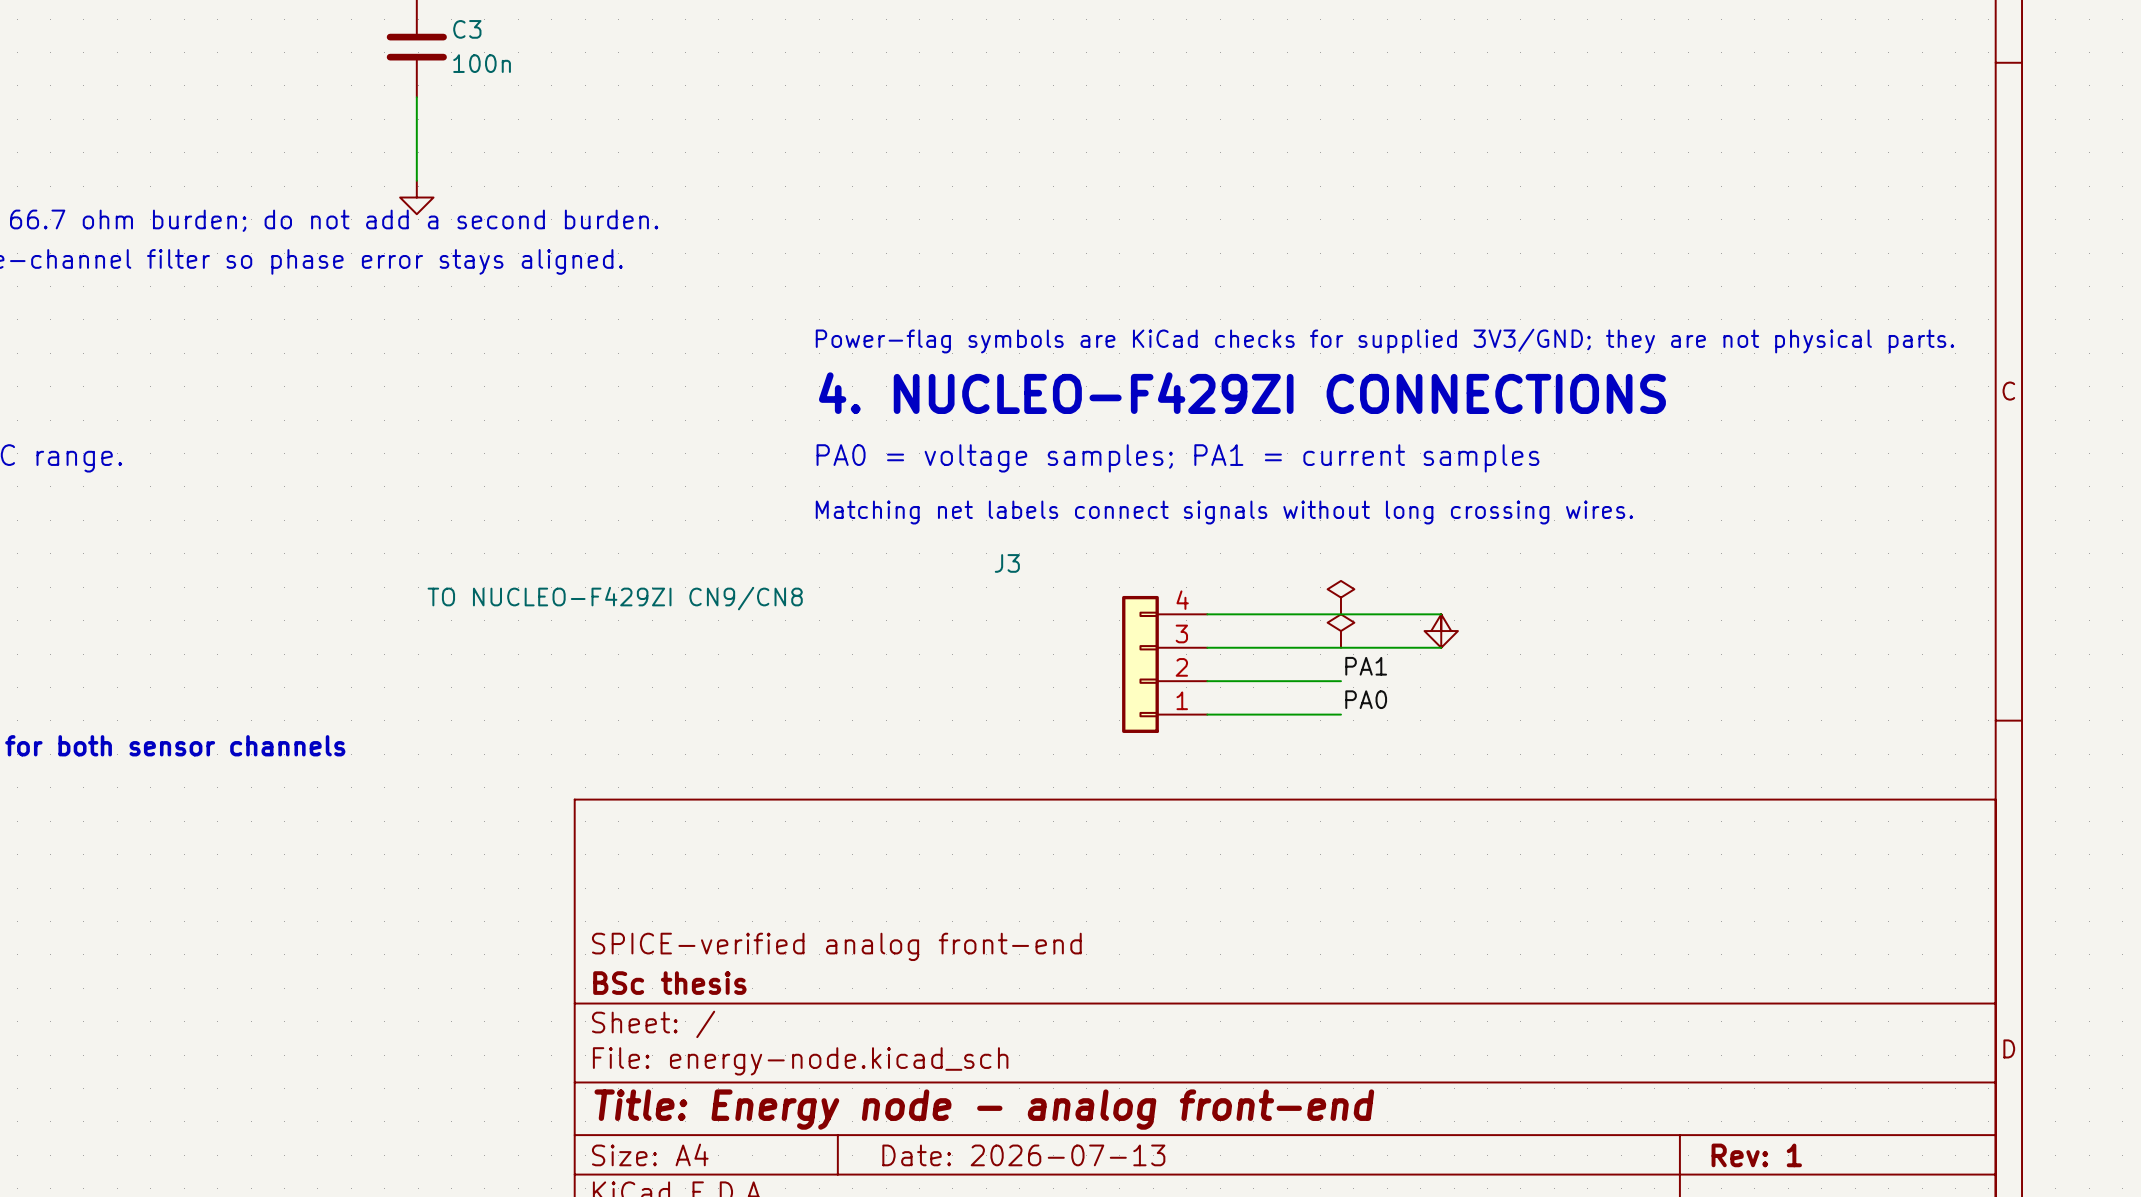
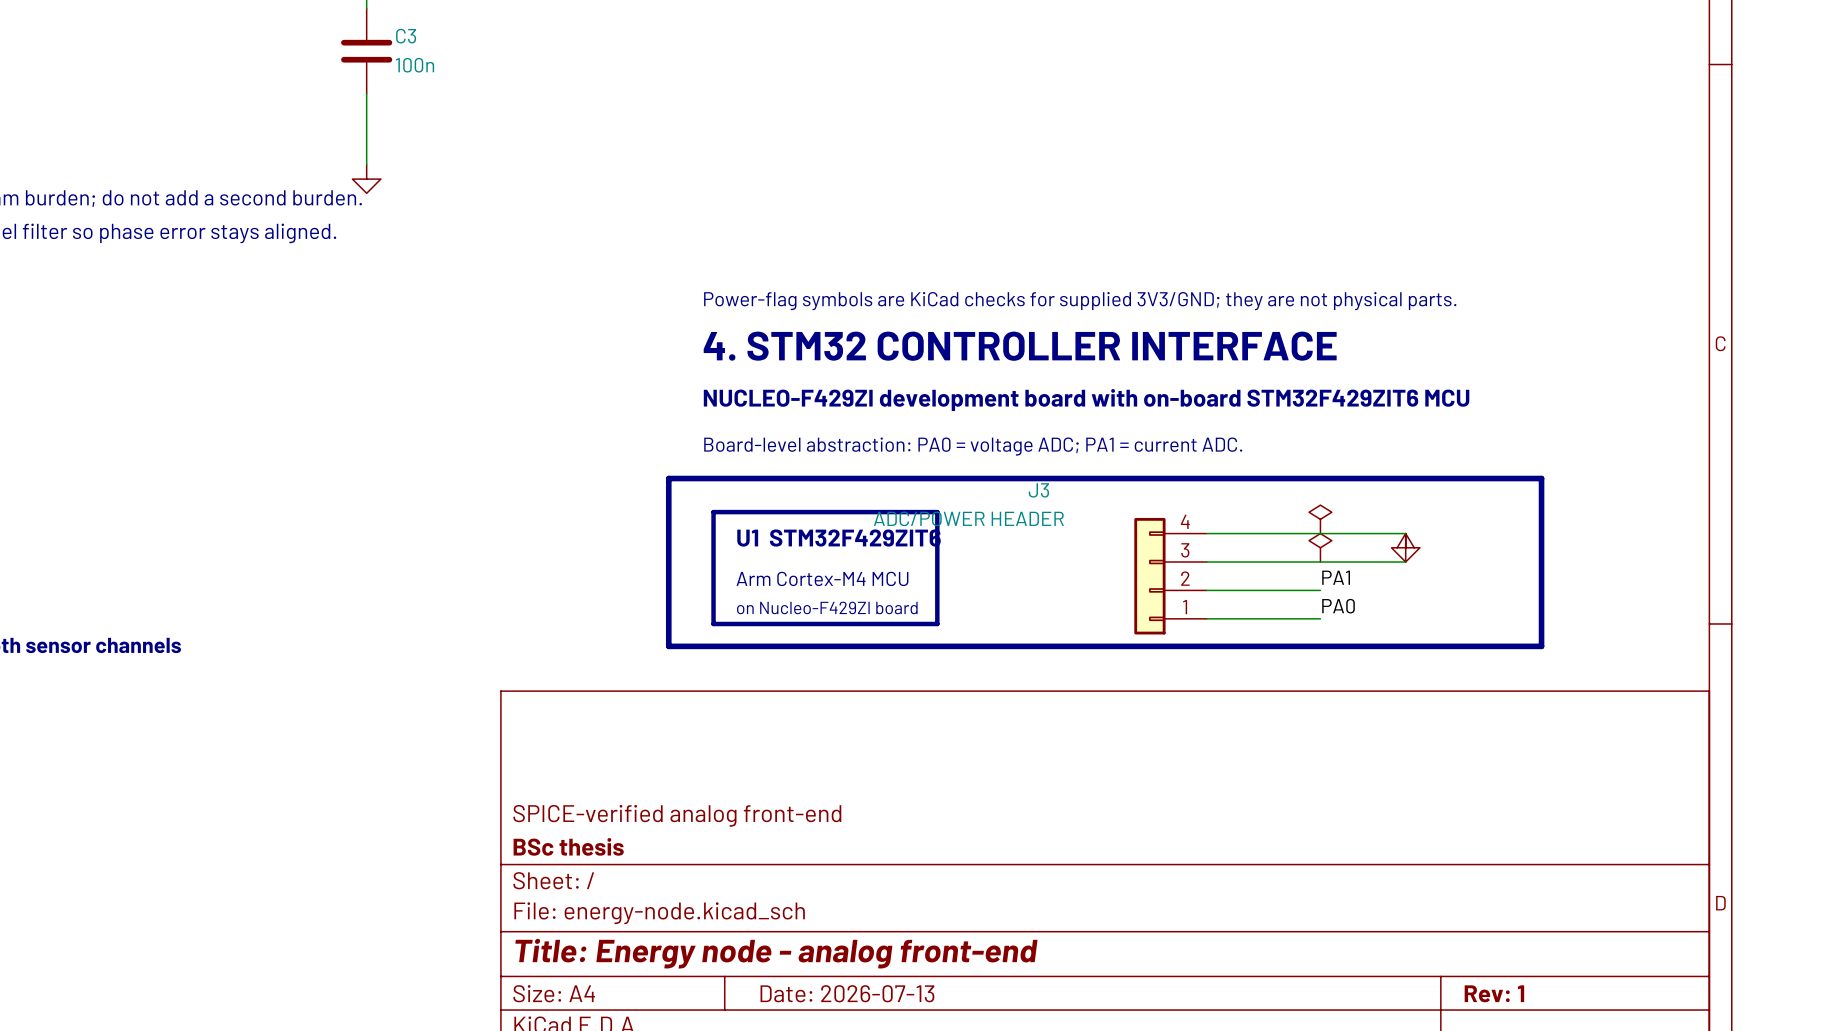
text: 4. NUCLEO-F429ZI CONNECTIONS (1242, 393) -> 4. STM32 CONTROLLER INTERFACE (1020, 346)
text: PA0 = voltage samples; PA1 = current samples (1177, 458) -> NUCLEO-F429ZI development board with on-board STM32F429ZIT6 MCU (1086, 400)
text: Matching net labels connect signals without long crossing wires. (1224, 512) -> Board-level abstraction: PA0 = voltage ADC; PA1 = current ADC. (973, 446)
line: none -> (668, 478) (1541, 478) (1541, 646) (668, 646) (668, 478)
line: none -> (713, 512) (937, 512) (937, 623) (713, 623) (713, 512)
power symbol: (1340, 597) -> none
power symbol: none -> (1320, 519)
J3 value: TO NUCLEO-F429ZI CN9/CN8 (615, 598) -> ADC/POWER HEADER (968, 518)
wire: (1207, 614) (1404, 614) -> (1237, 533) (1405, 533)
text: none -> U1 STM32F429ZIT6 (839, 538)
power symbol: (1340, 631) -> none
power symbol position: (1441, 631) -> (1405, 547)
power symbol position: (1441, 631) -> (1405, 547)
power symbol: none -> (1320, 547)
wire: (1207, 647) (1404, 647) -> (1237, 562) (1405, 562)
J3 position: (1164, 664) -> (1170, 576)
label position: PA1 (1366, 666) -> PA1 (1336, 577)
text: none -> Arm Cortex-M4 MCU (822, 578)
wire: (1207, 681) (1340, 681) -> (1206, 590) (1320, 590)
label position: PA0 (1366, 699) -> PA0 (1338, 606)
text: none -> on Nucleo-F429ZI board (827, 607)
wire: (1207, 714) (1340, 714) -> (1206, 618) (1320, 618)

